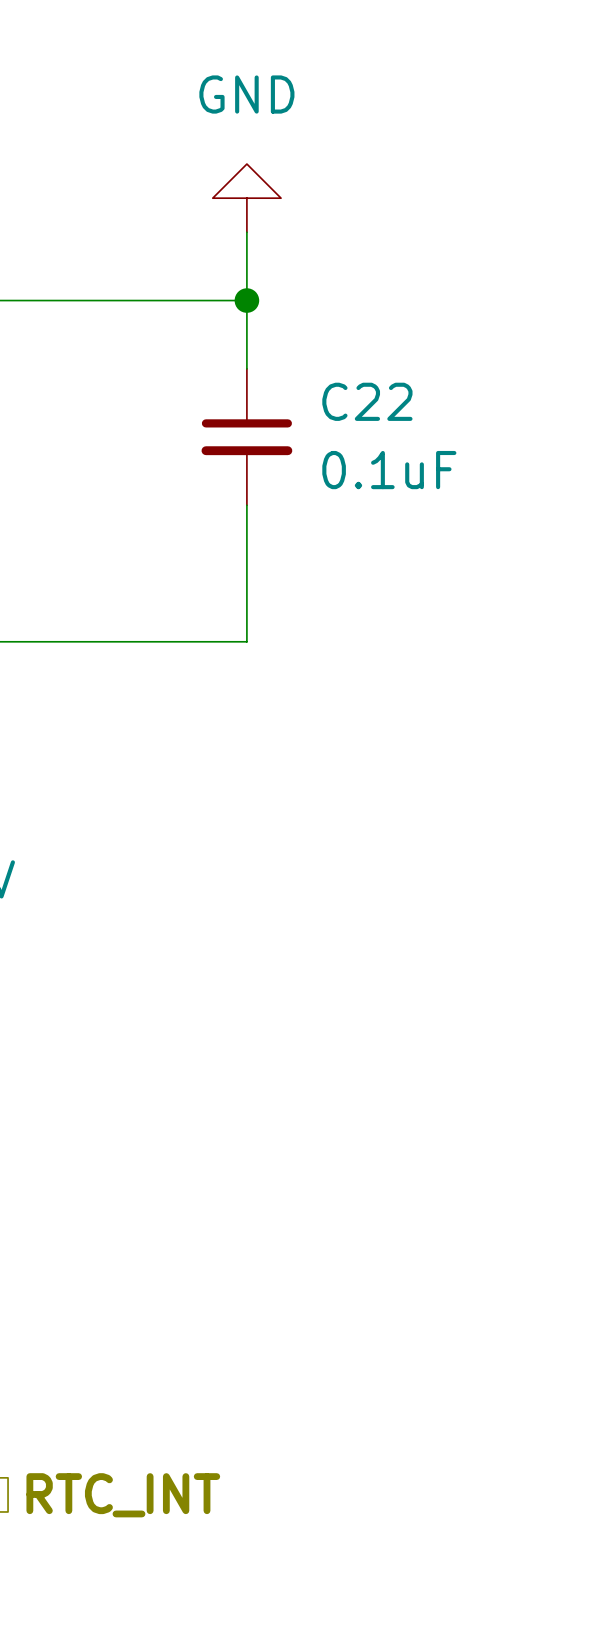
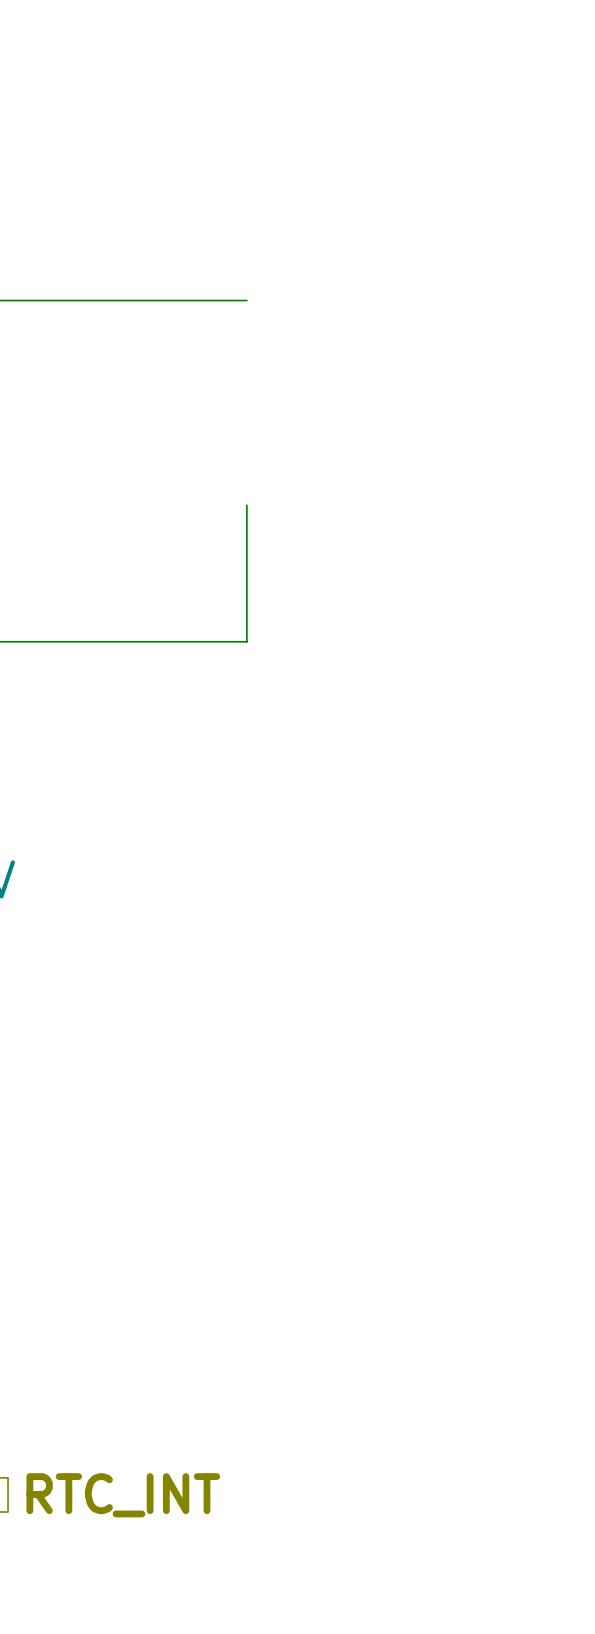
power symbol: GND (246, 198) -> none
wire: (246, 232) (246, 368) -> none
junction: (246, 300) -> none
C22: 0.1uF (246, 437) -> none

